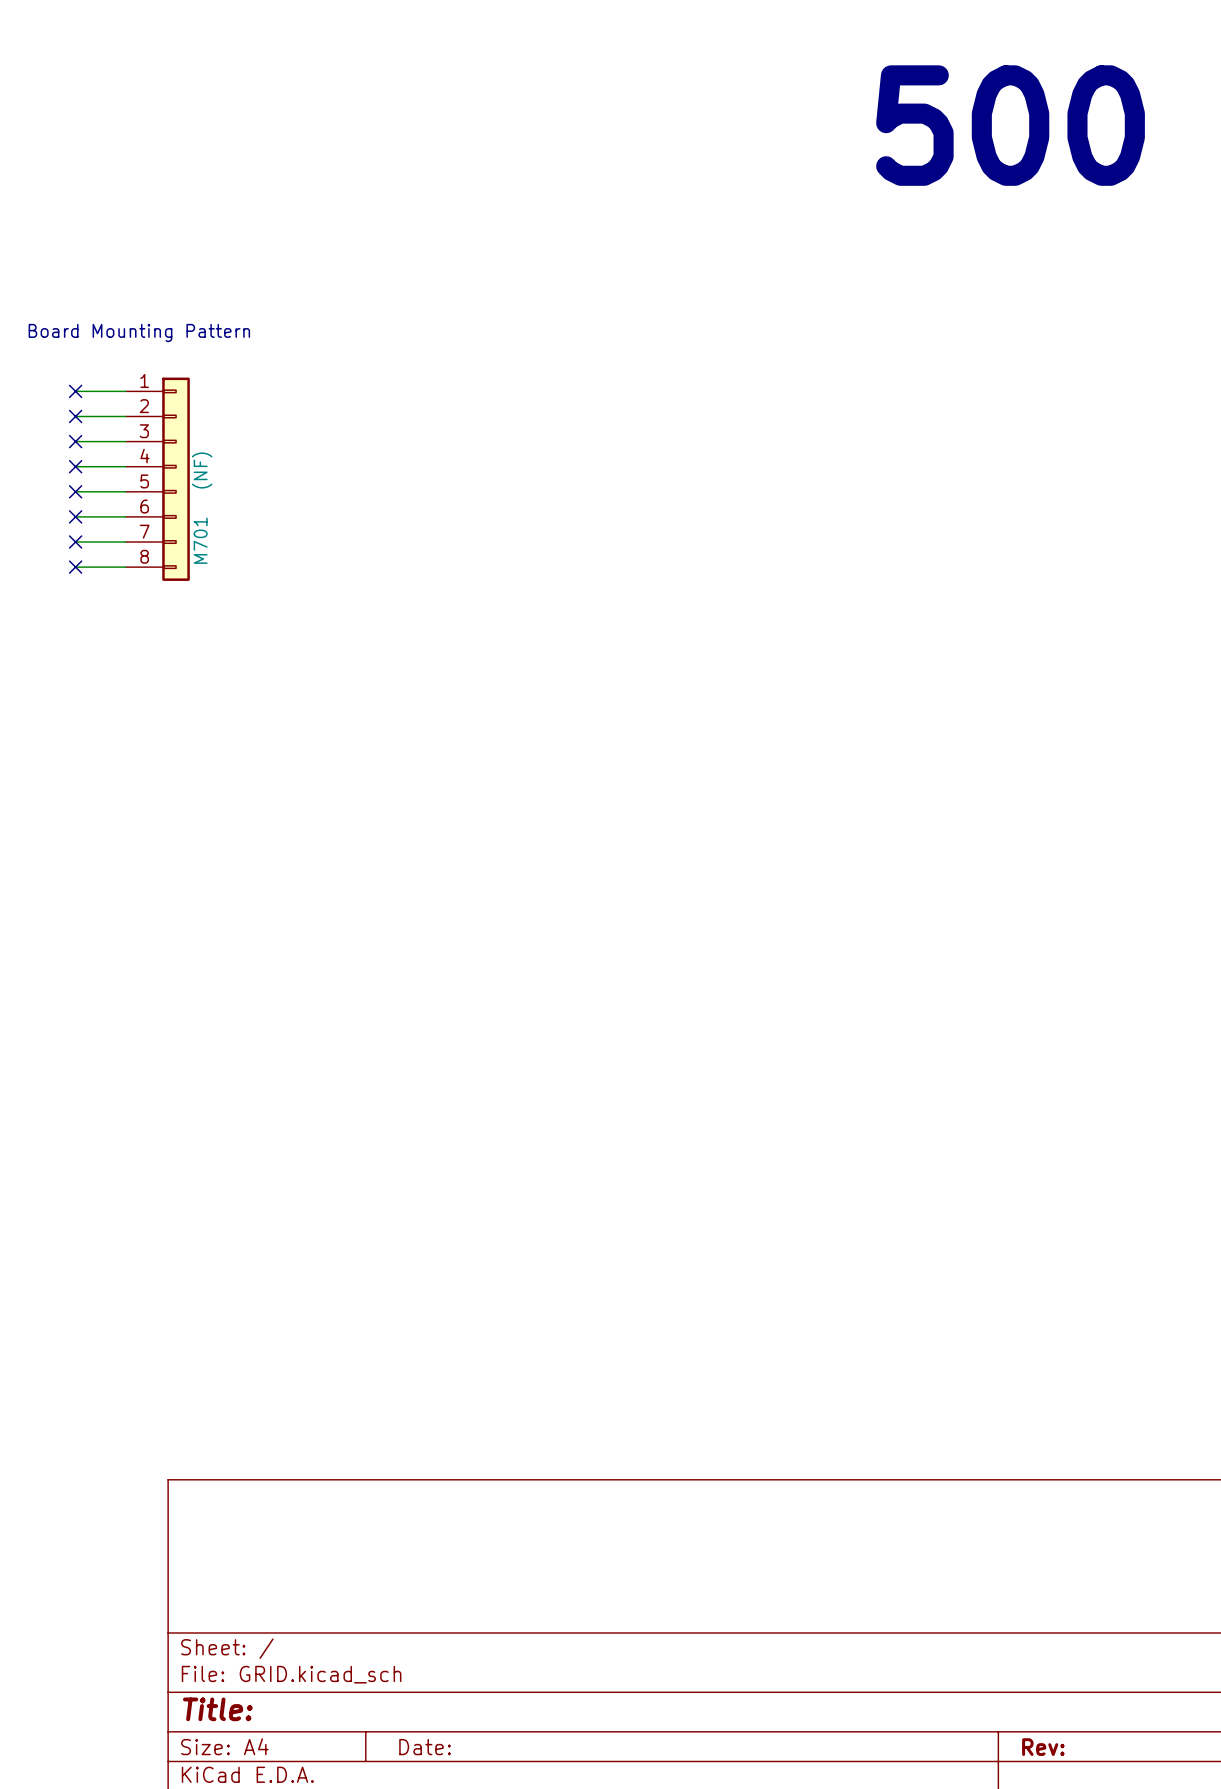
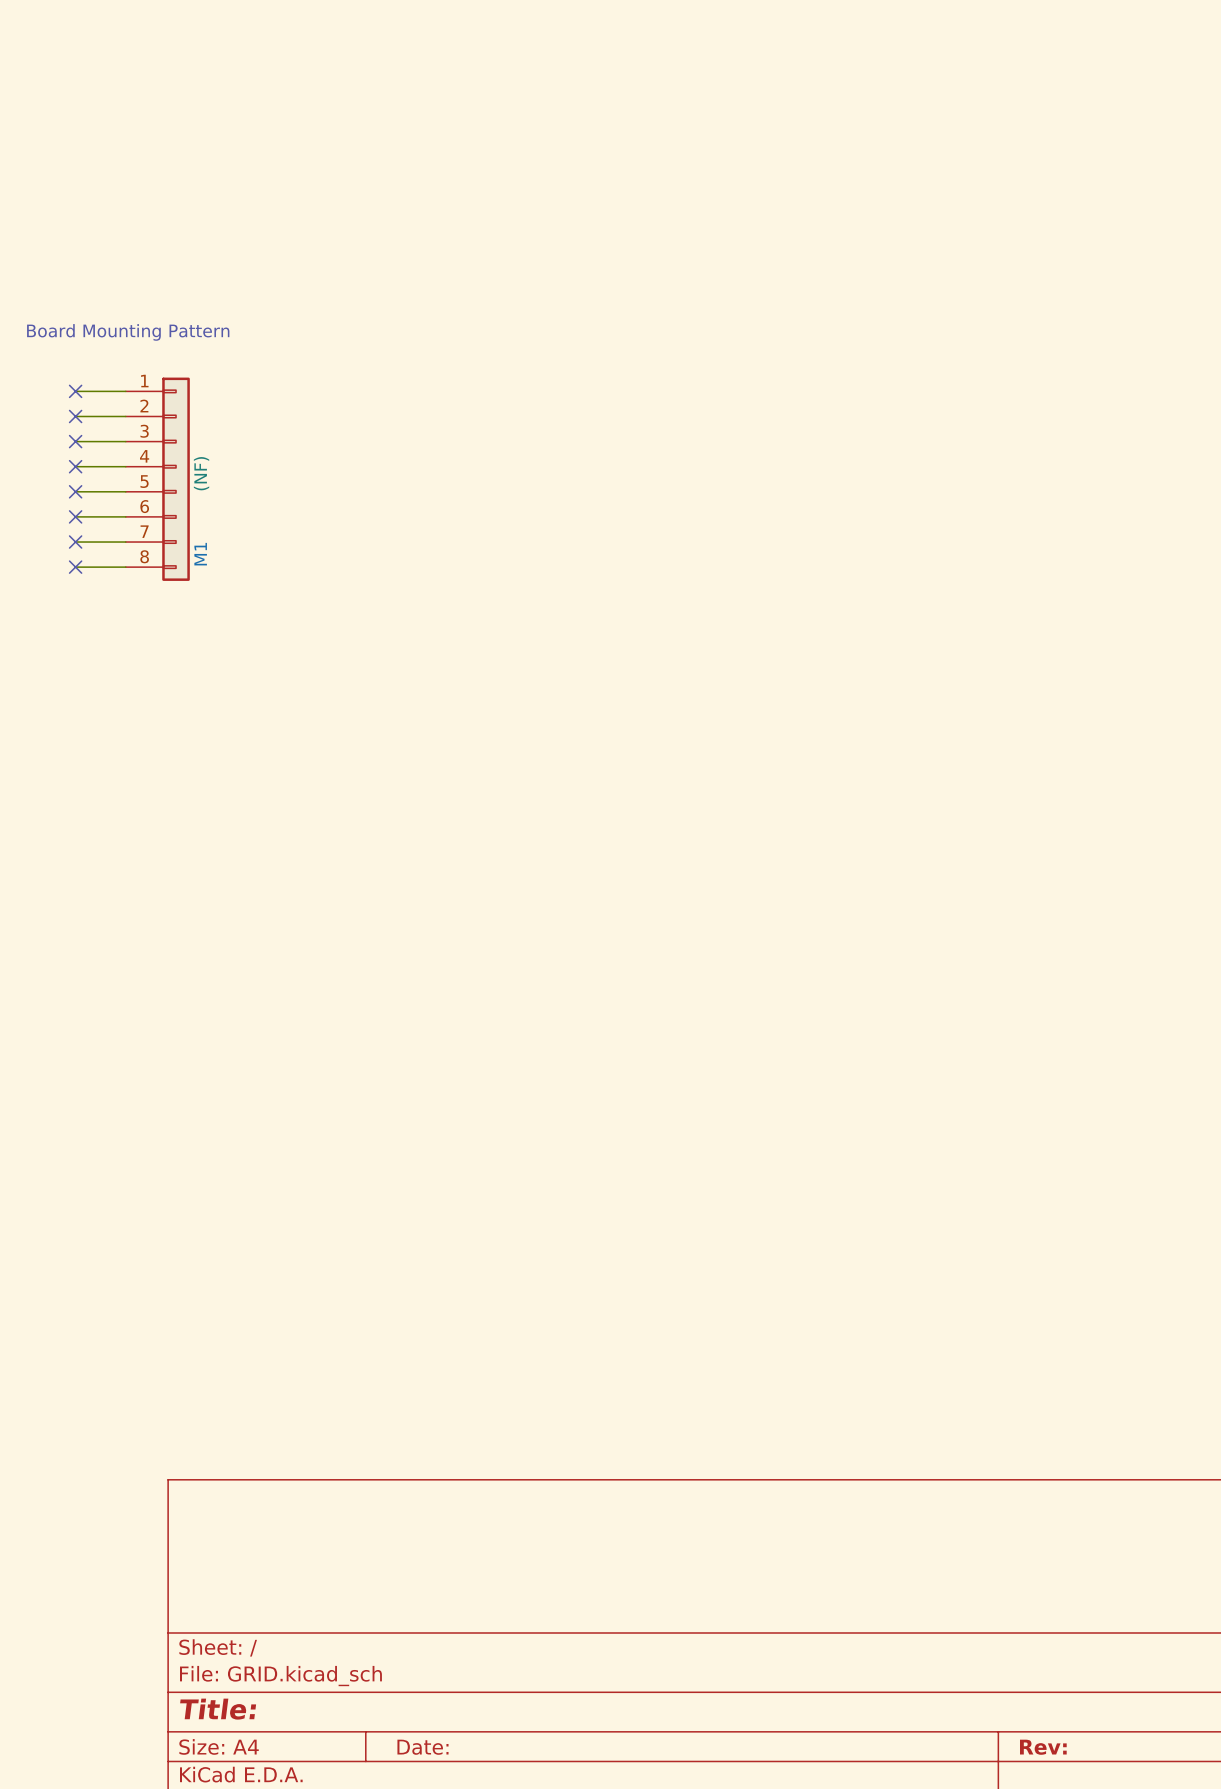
text: 500 (1010, 125) -> none
M701 name: M701 (200, 540) -> M1 (200, 554)

